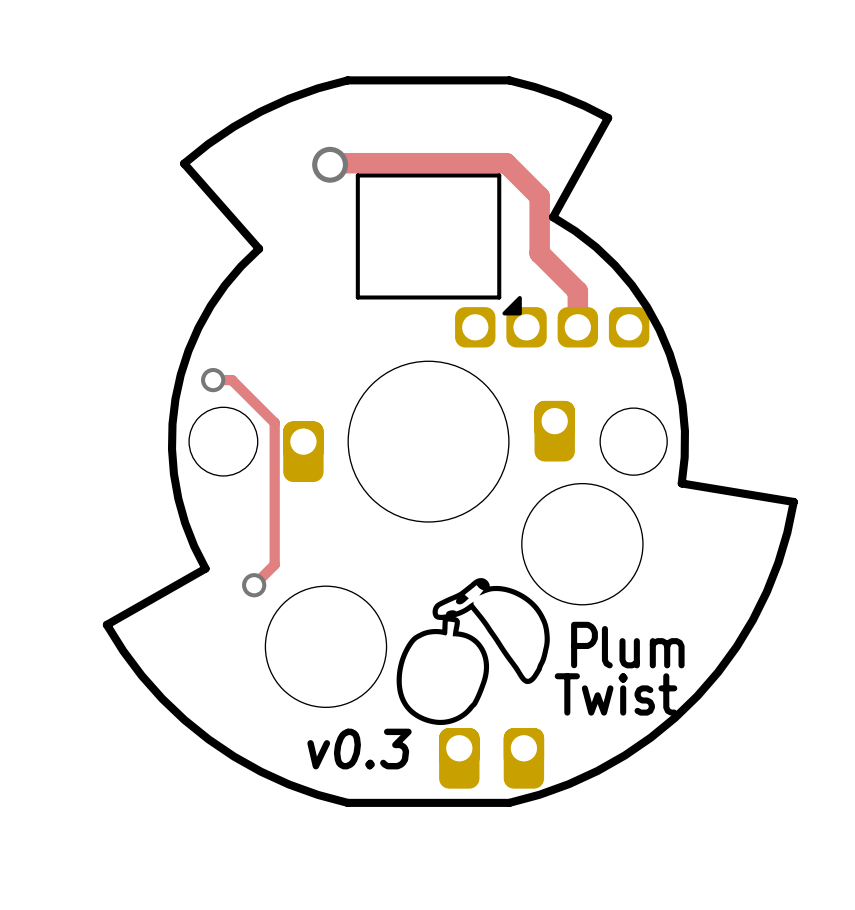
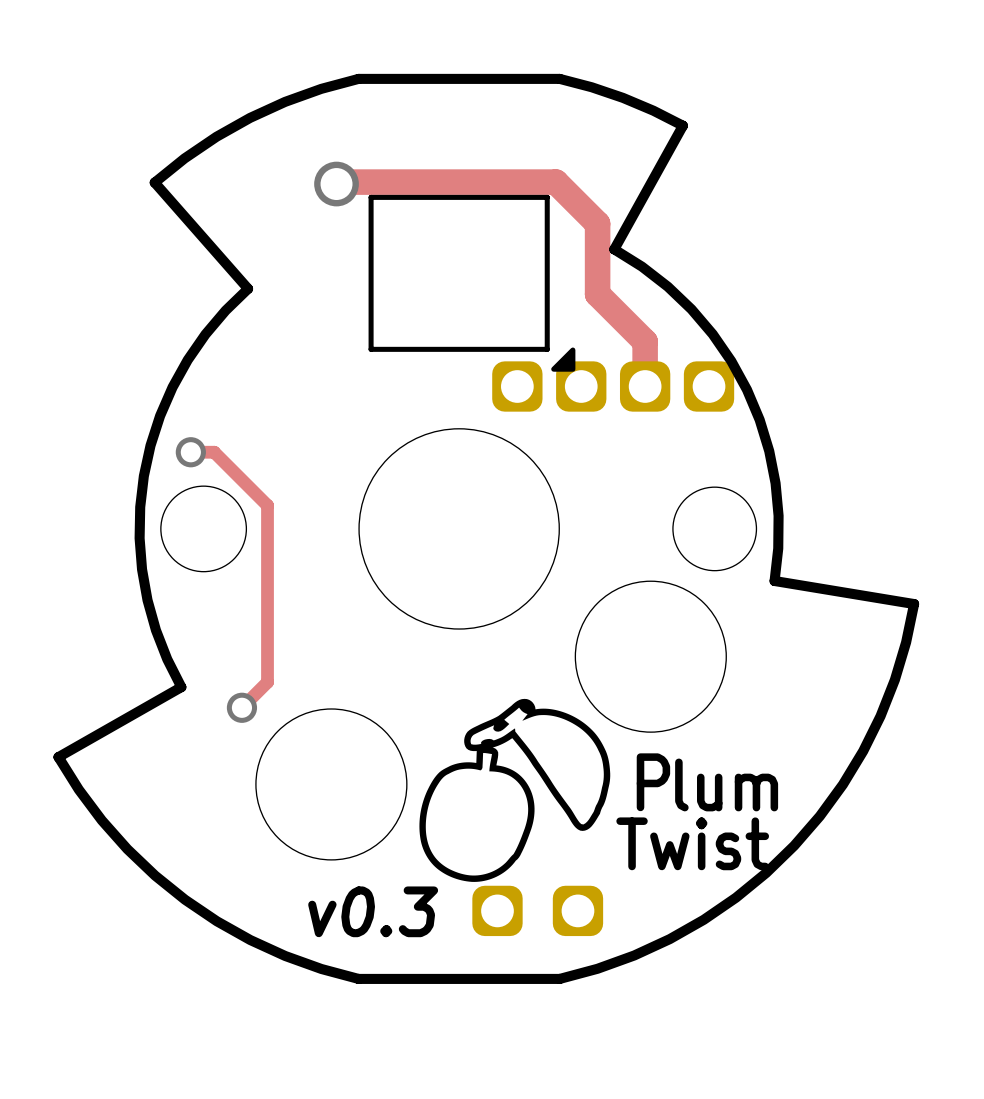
part: (554, 431) -> none
part: (303, 451) -> none
part footprint: [439, 728, 480, 789] -> [472, 885, 523, 937]
part footprint: [503, 728, 545, 789] -> [552, 885, 604, 937]

